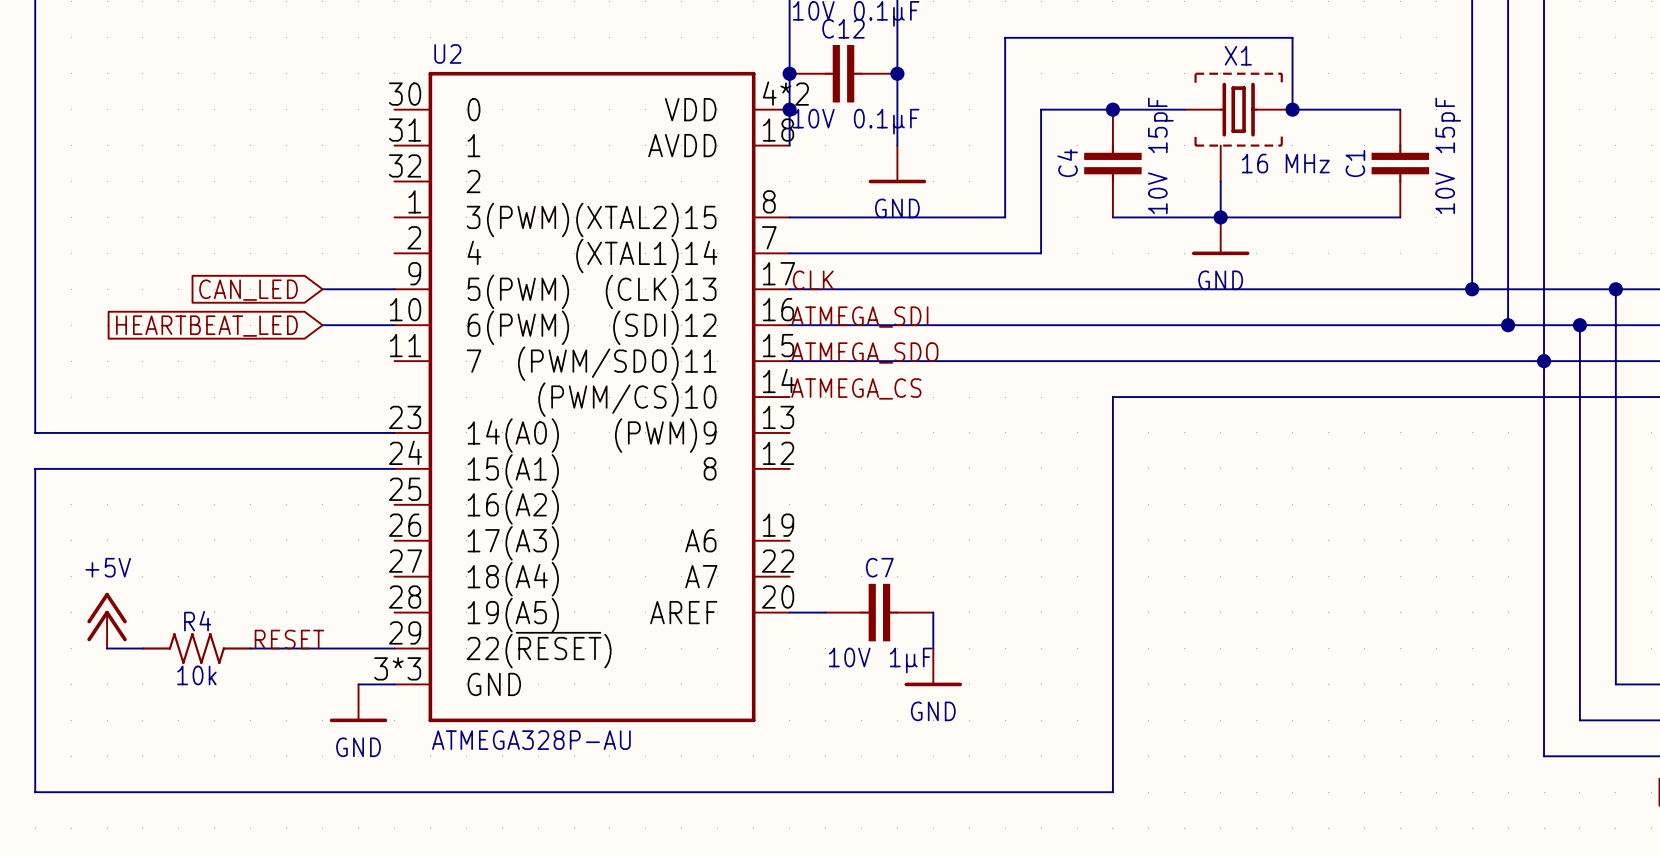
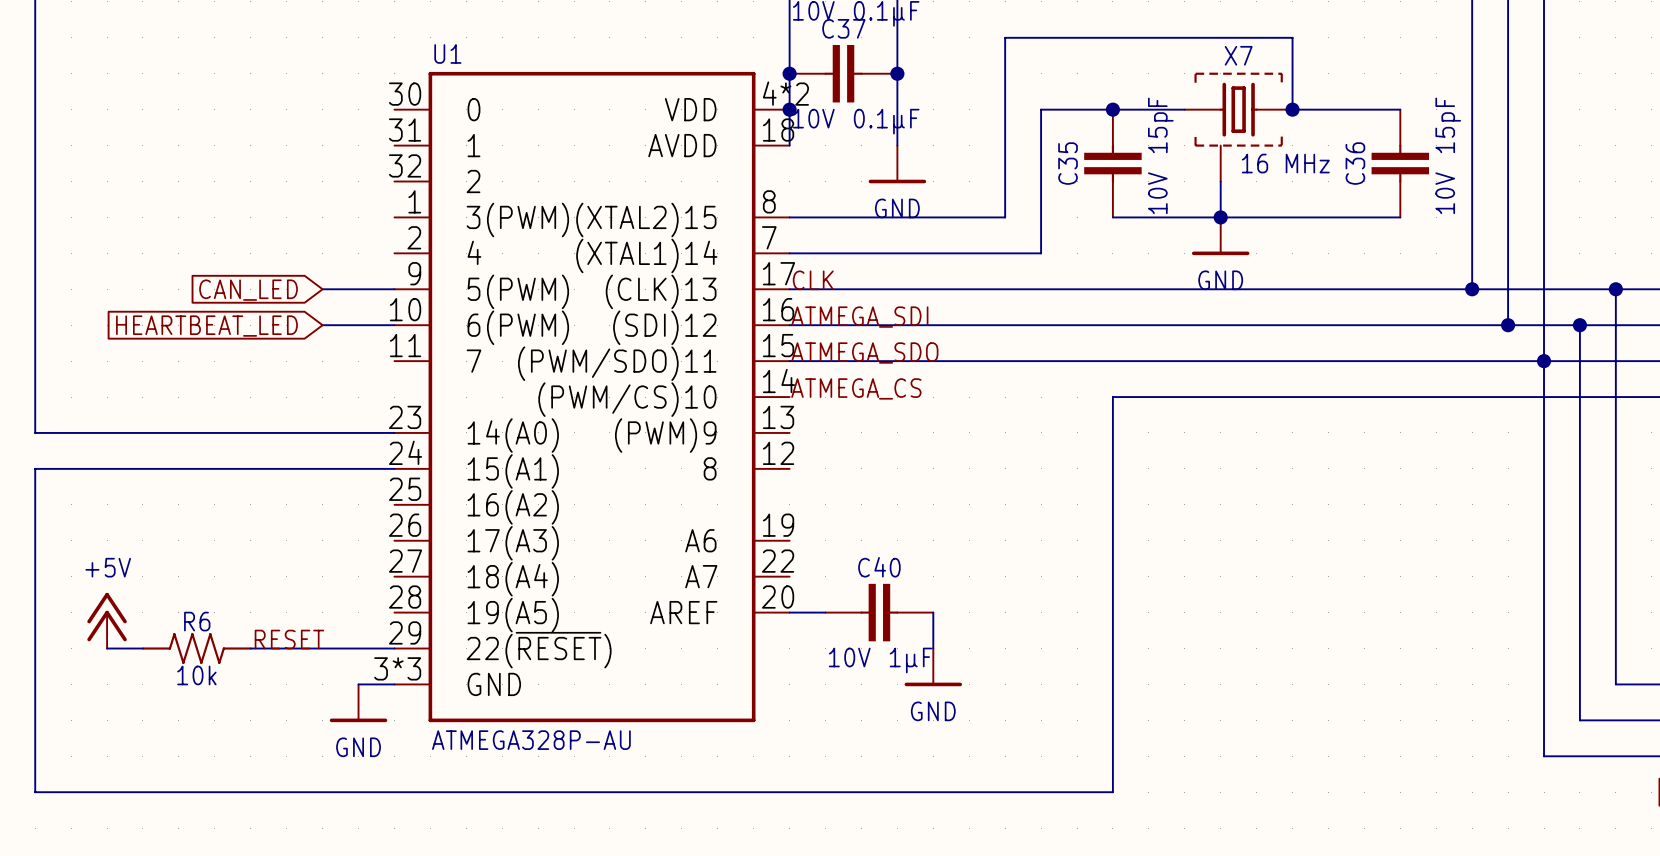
C12 name: C12 (843, 28) -> C37 (843, 28)
U2 name: U2 (447, 53) -> U1 (447, 53)
X1 name: X1 (1238, 55) -> X7 (1238, 55)
C4 name: C4 (1067, 163) -> C35 (1068, 163)
C1 name: C1 (1355, 163) -> C36 (1355, 163)
C7 name: C7 (879, 567) -> C40 (879, 567)
R4 name: R4 (197, 621) -> R6 (197, 621)

